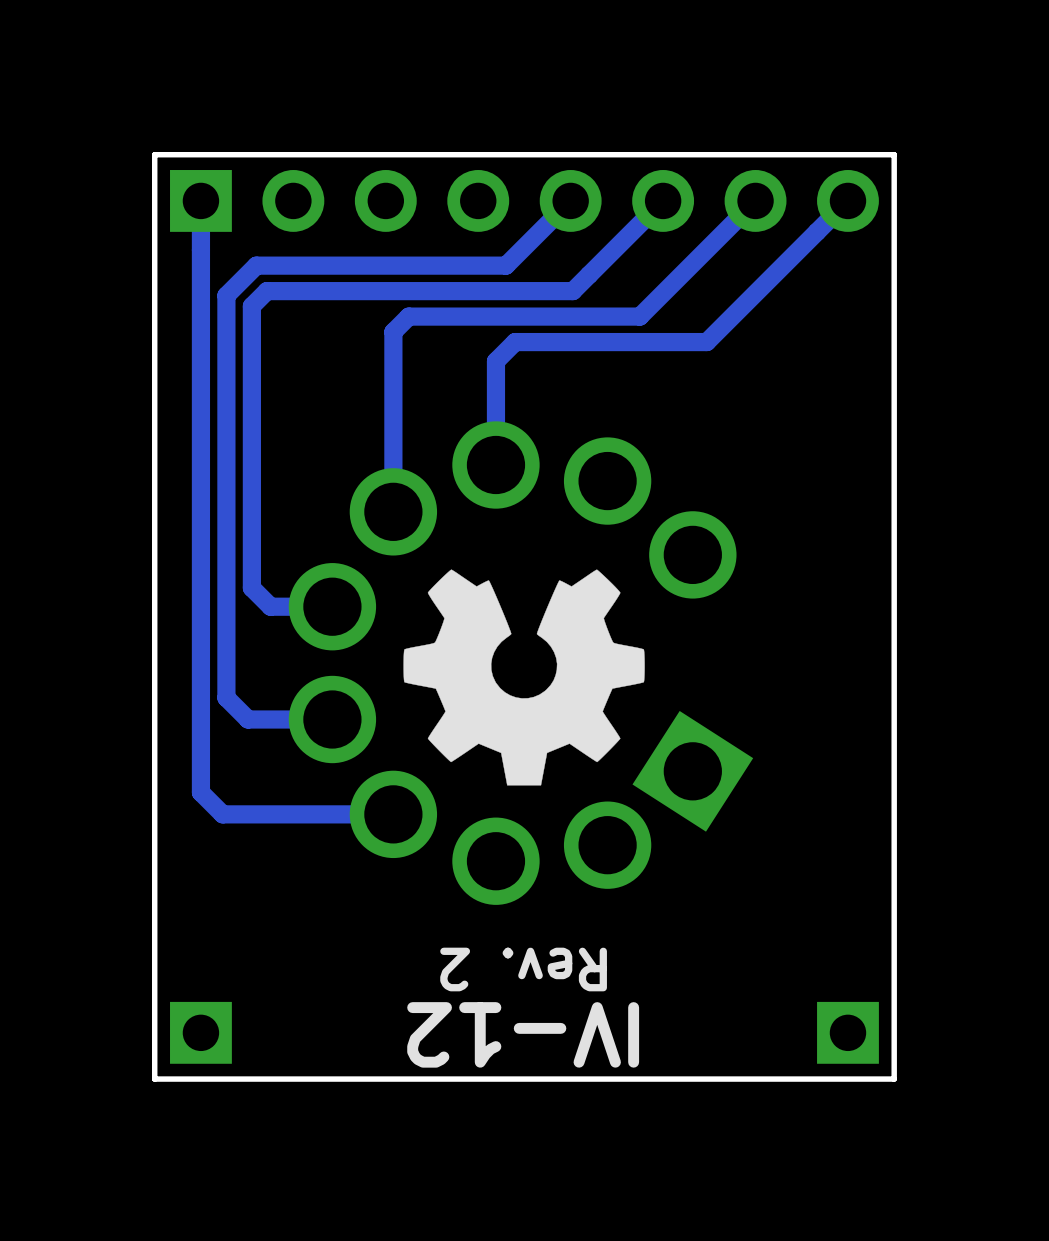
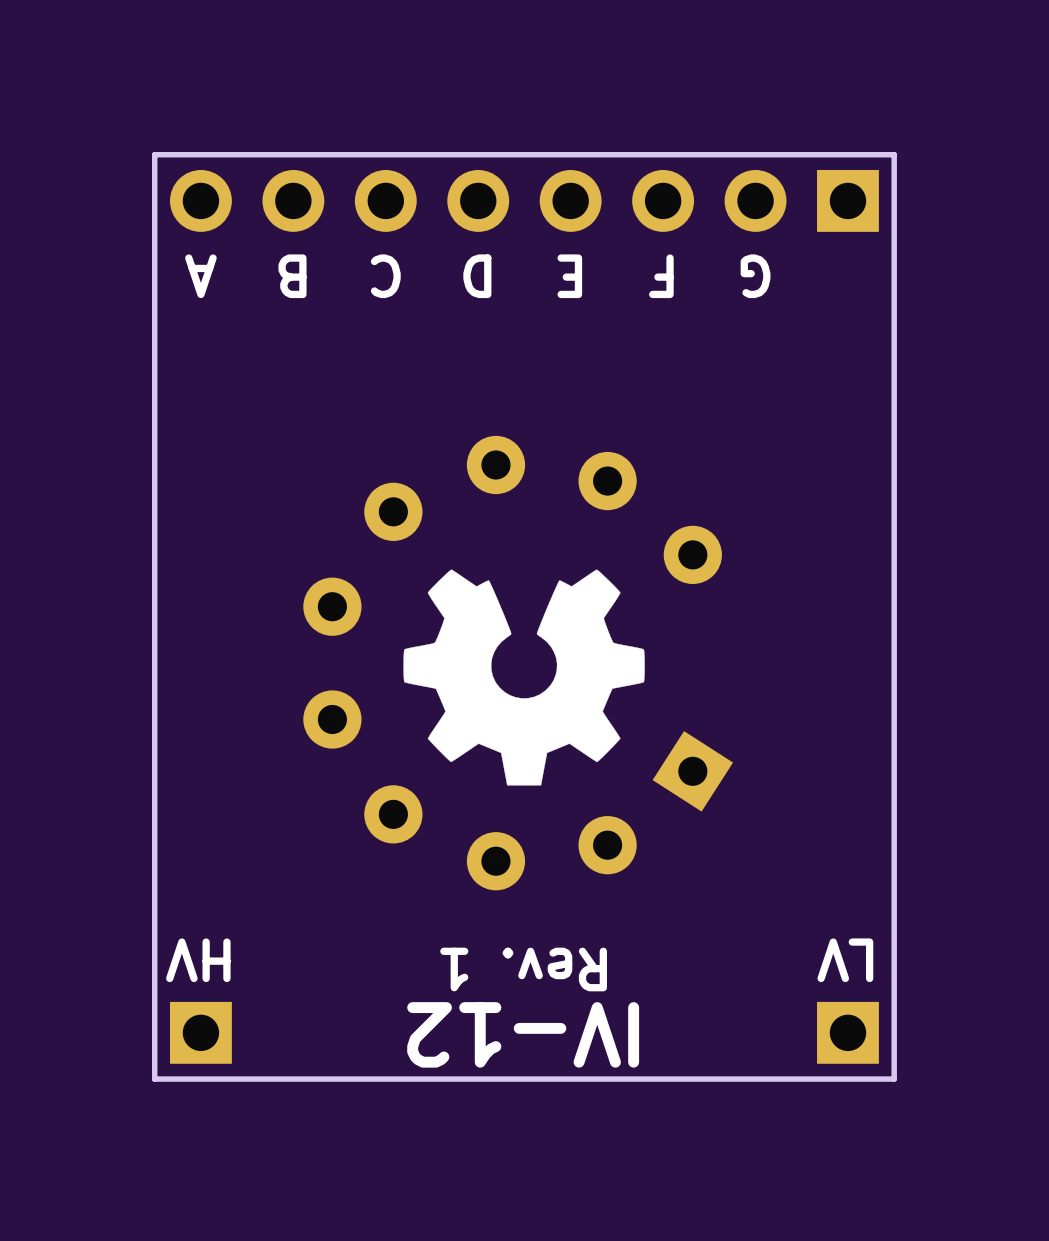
track: (200, 200) (200, 792) (222, 814) (393, 814) -> none
part rotation: 0° (524, 200) -> 180° (524, 200)
track: (570, 200) (505, 265) (256, 265) (226, 295) (226, 697) (248, 719) (332, 719) -> none
track: (663, 200) (572, 291) (266, 291) (251, 306) (251, 587) (270, 606) (332, 606) -> none
track: (755, 200) (639, 316) (408, 316) (393, 332) (393, 511) -> none
track: (847, 200) (706, 342) (515, 342) (495, 361) (495, 464) -> none
text: none -> A (200, 276)
text: none -> B (292, 276)
text: none -> C (385, 276)
text: none -> D (477, 276)
text: none -> E (569, 276)
text: none -> F (661, 276)
text: none -> G (755, 276)
part footprint: [288, 421, 754, 905] -> [303, 435, 734, 891]
text: none -> HV (198, 960)
text: none -> LV (845, 960)
text: Rev. 2 (523, 969) -> Rev. 1 (523, 969)

